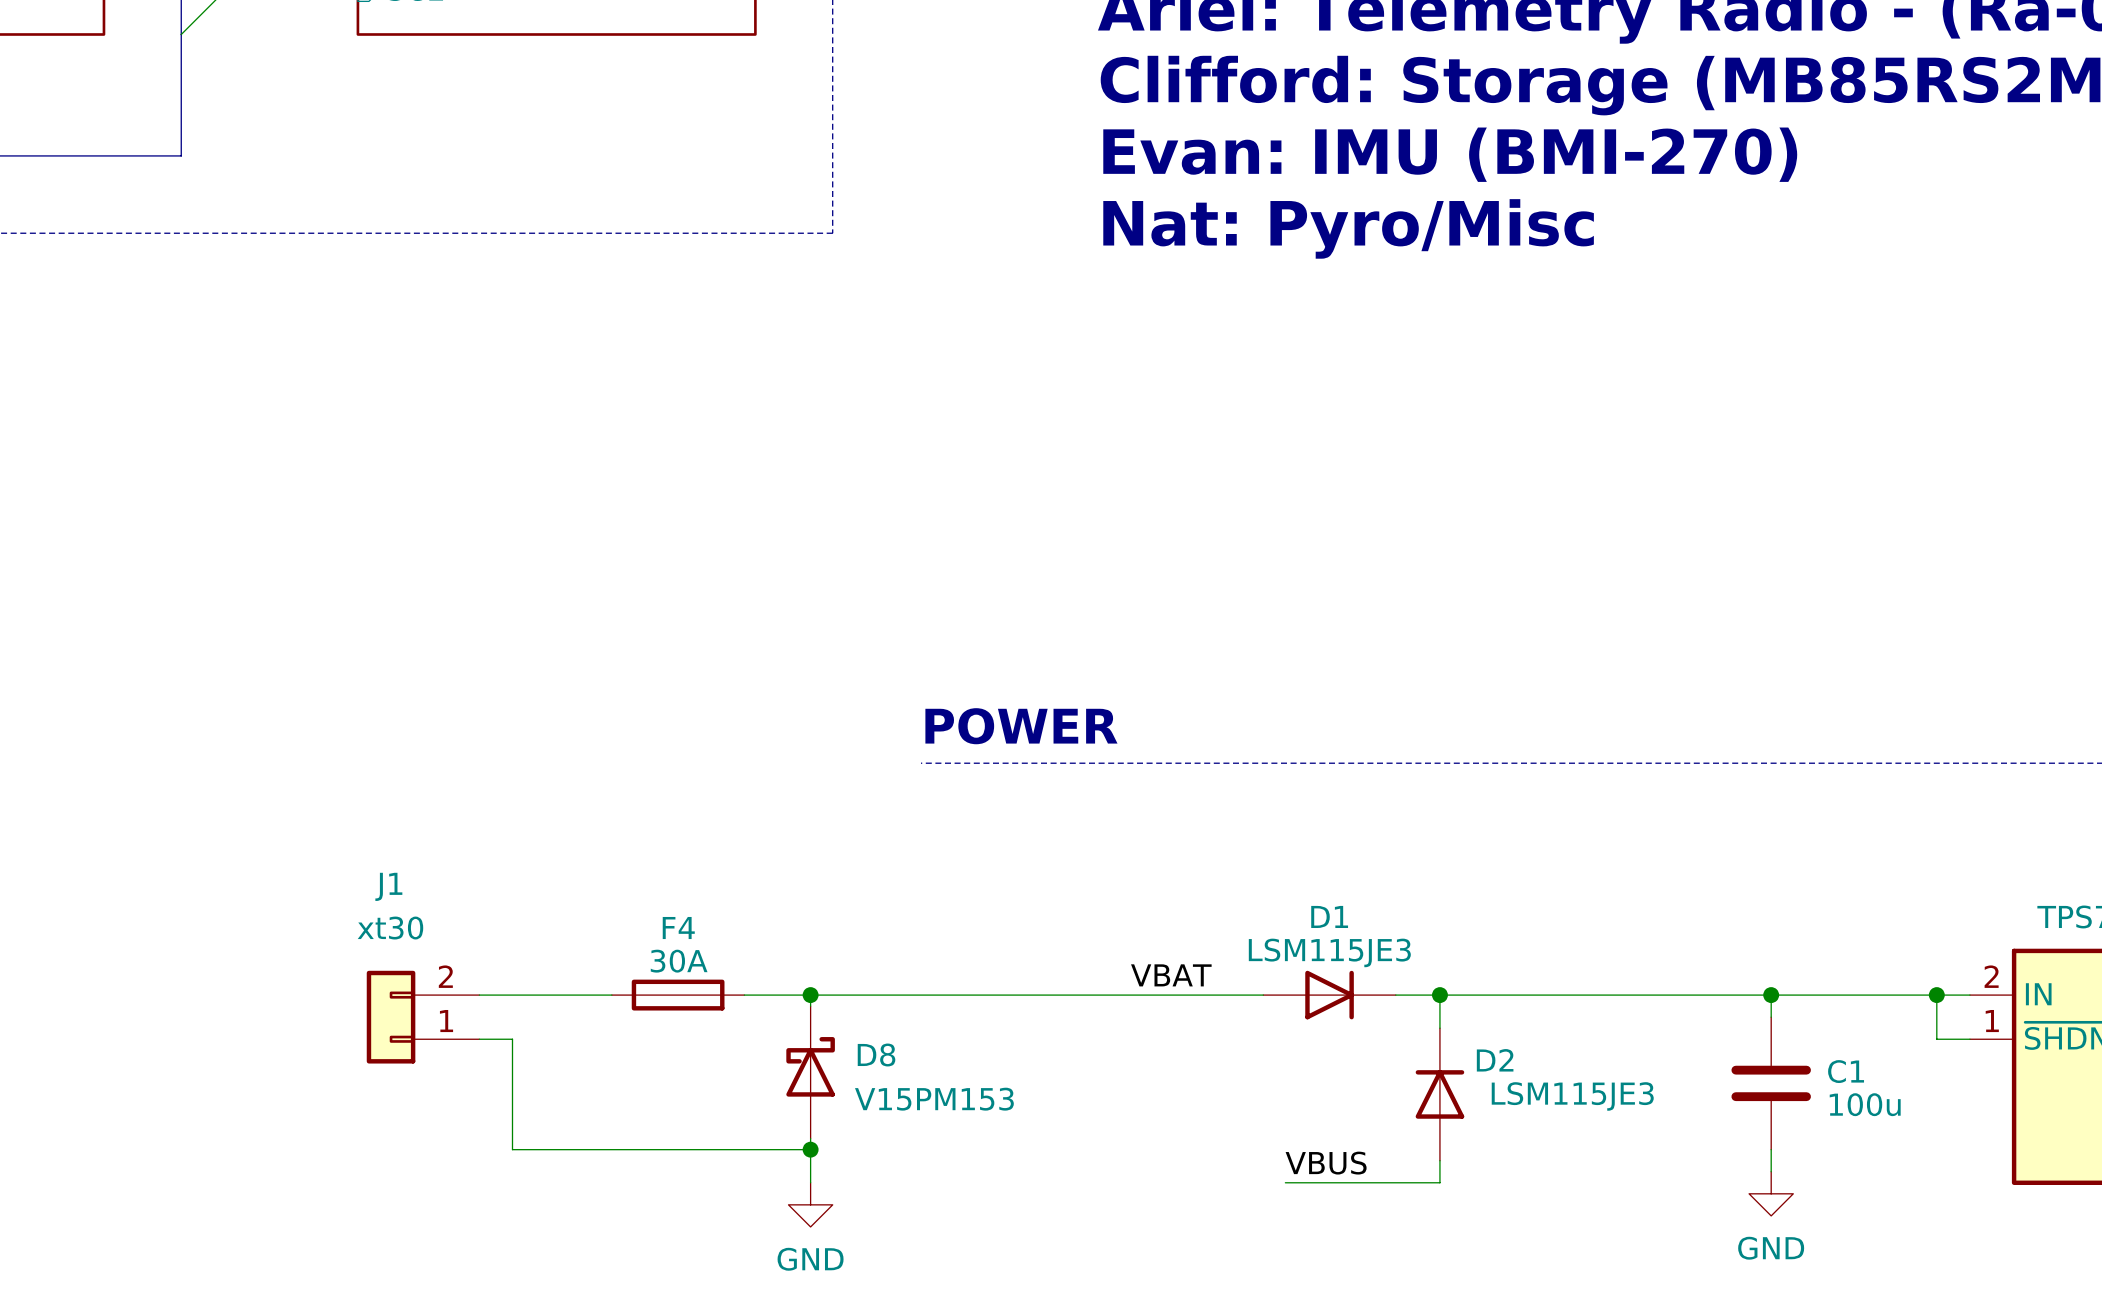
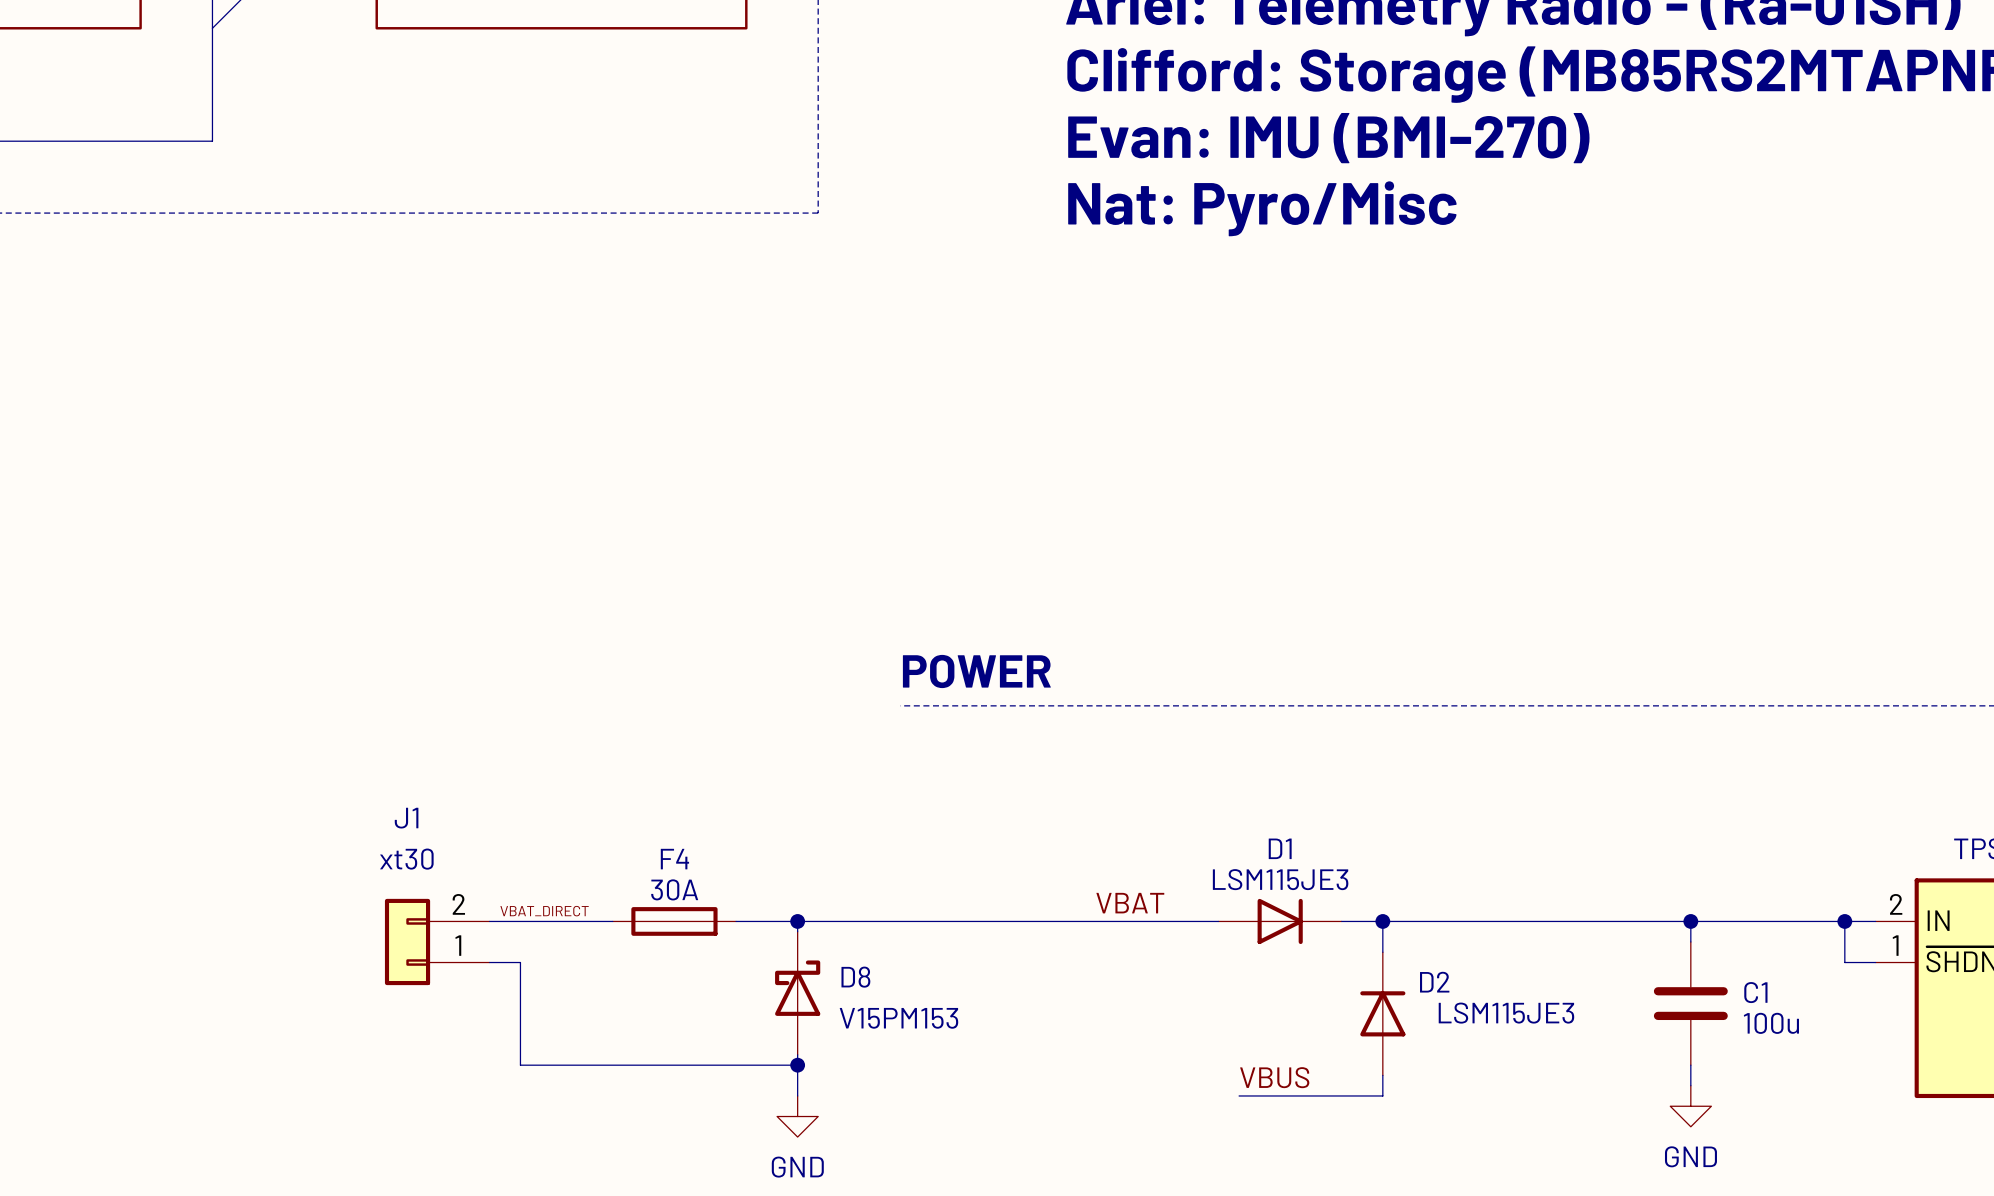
label: none -> VBAT_DIRECT (544, 911)

